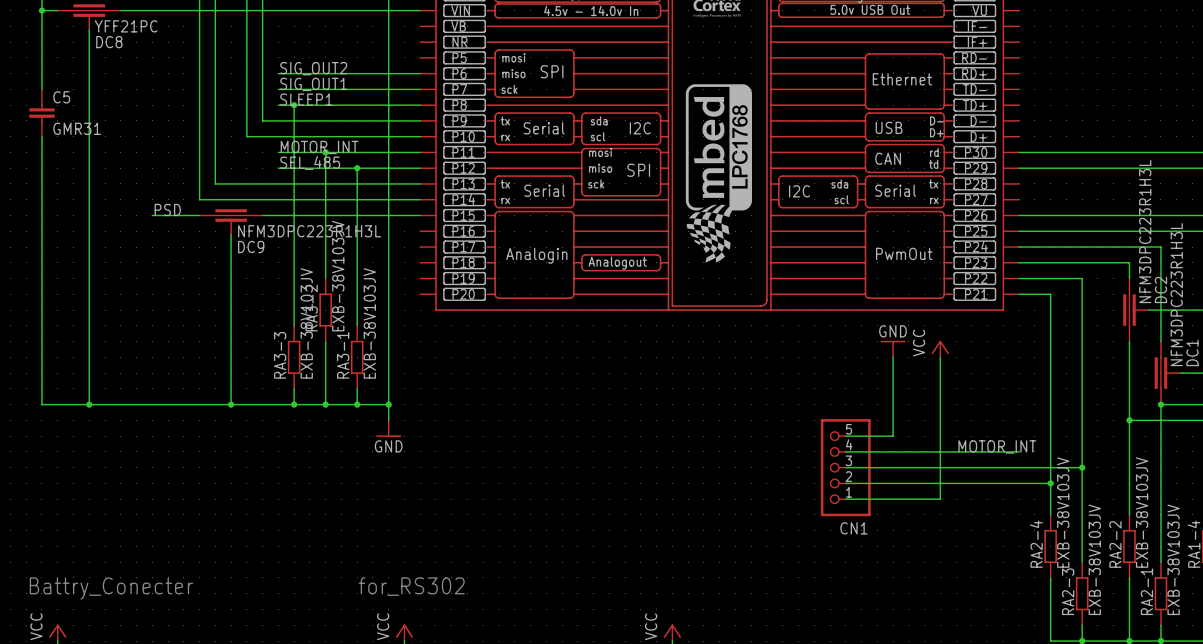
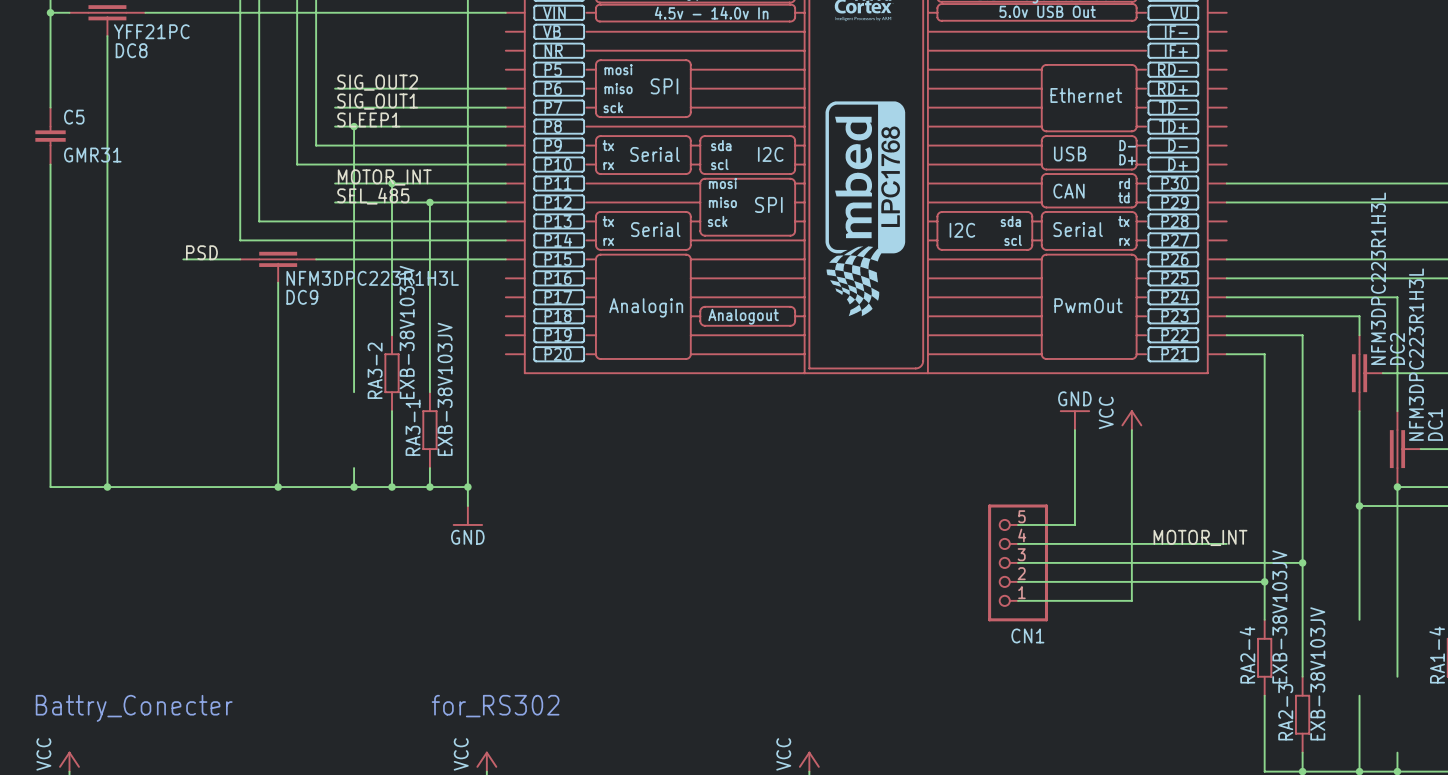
RA3-3: EXB-38V103JV (294, 357) -> none
RA2-2: EXB-38V103JV (1129, 546) -> none
RA2-1: EXB-38V103JV (1160, 593) -> none

